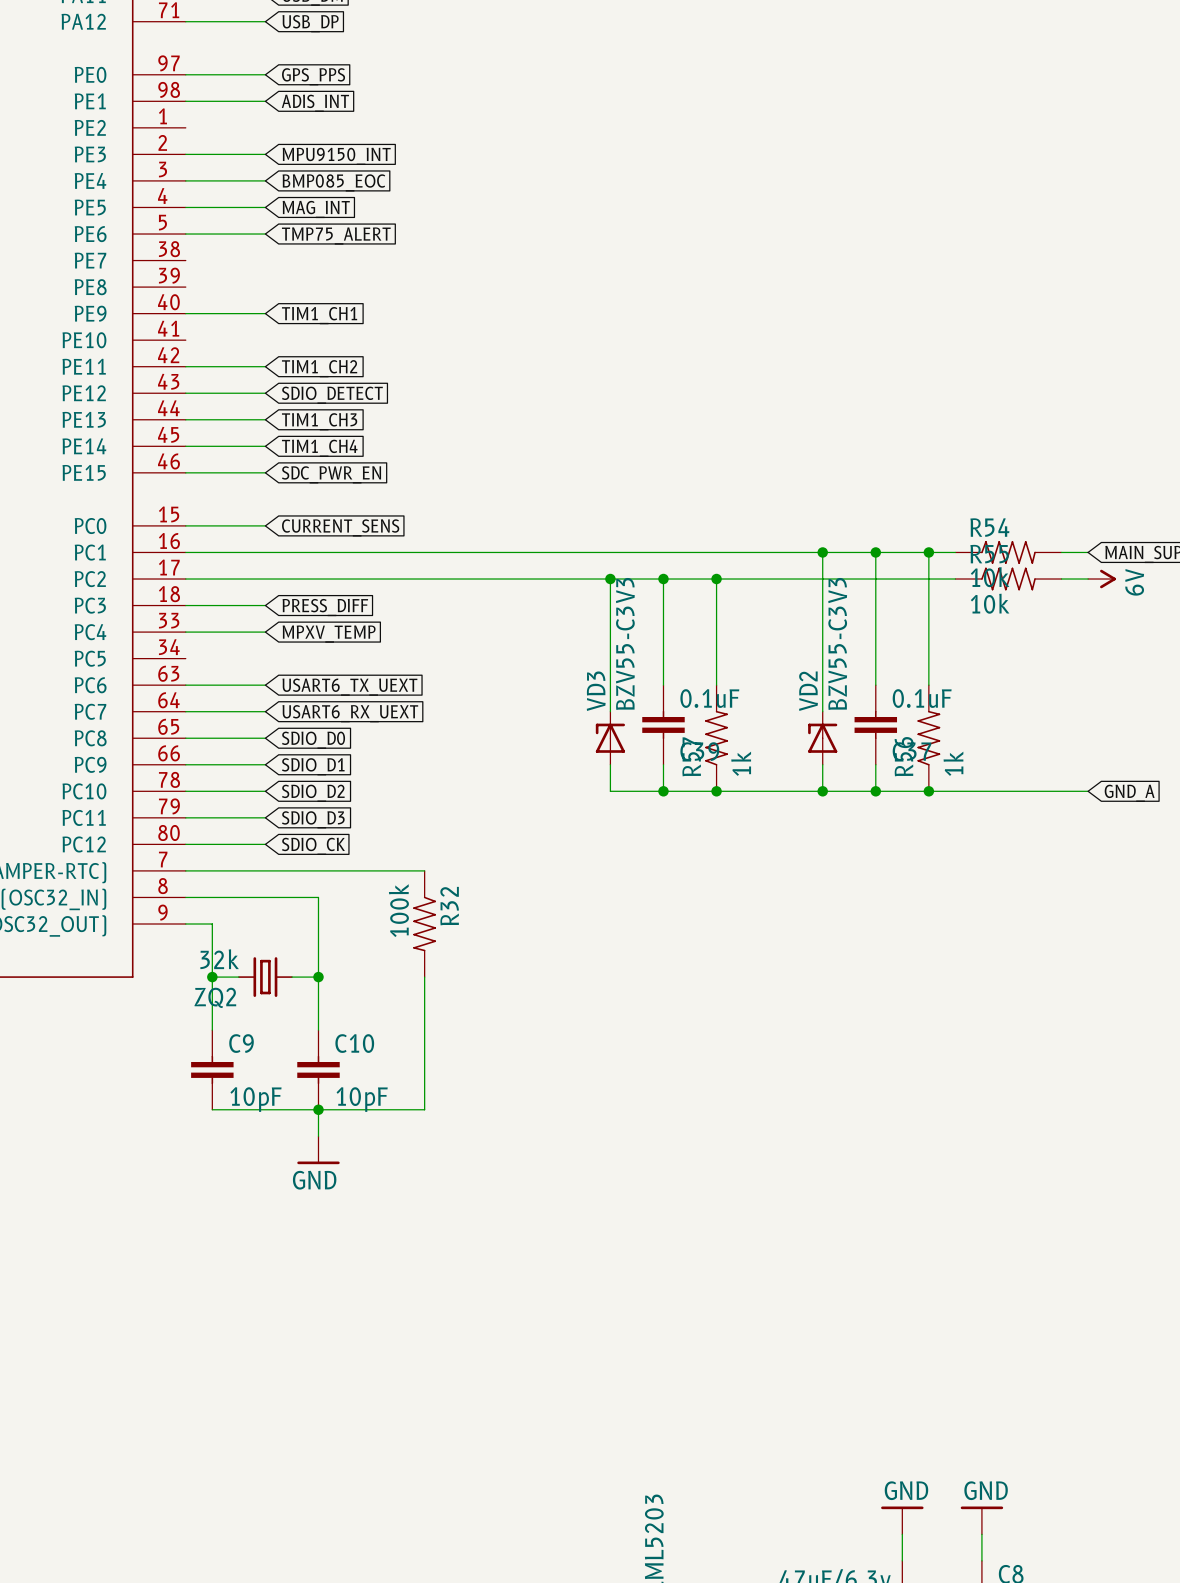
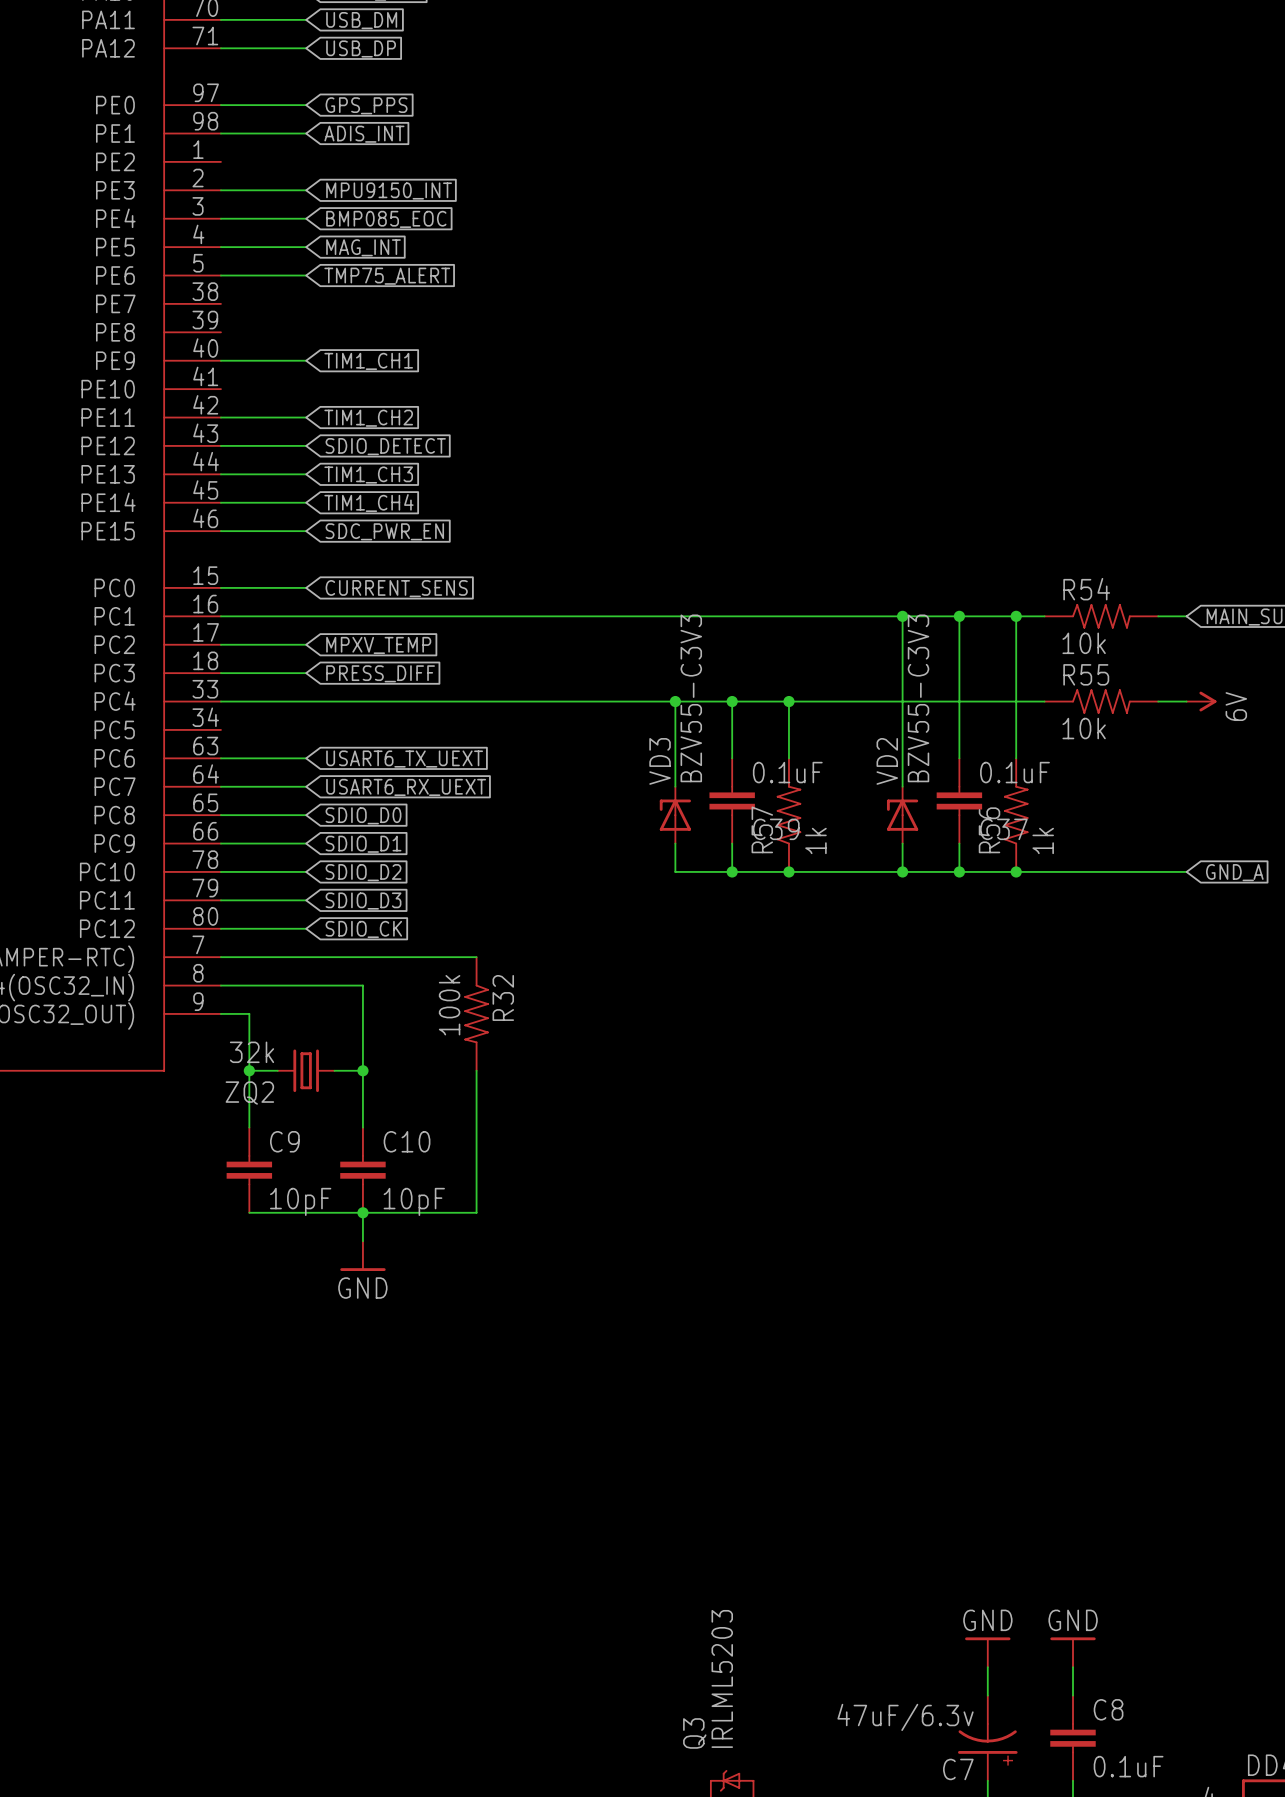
wire: (265, 579) (955, 579) -> (306, 701) (1044, 701)
wire: (610, 579) (610, 632) -> none
junction: (610, 579) -> none
wire: (663, 579) (663, 632) -> none
junction: (663, 579) -> none
wire: (716, 579) (716, 632) -> none
junction: (716, 579) -> none
R55 position: (1008, 579) -> (1101, 701)
wire: (1061, 579) (1088, 579) -> (1158, 701) (1186, 701)
power symbol position: 6V (1102, 579) -> 6V (1201, 701)
junction: none -> (675, 701)
junction: none -> (732, 701)
junction: none -> (788, 701)
global label position: MPXV_TEMP (329, 634) -> MPXV_TEMP (378, 645)

